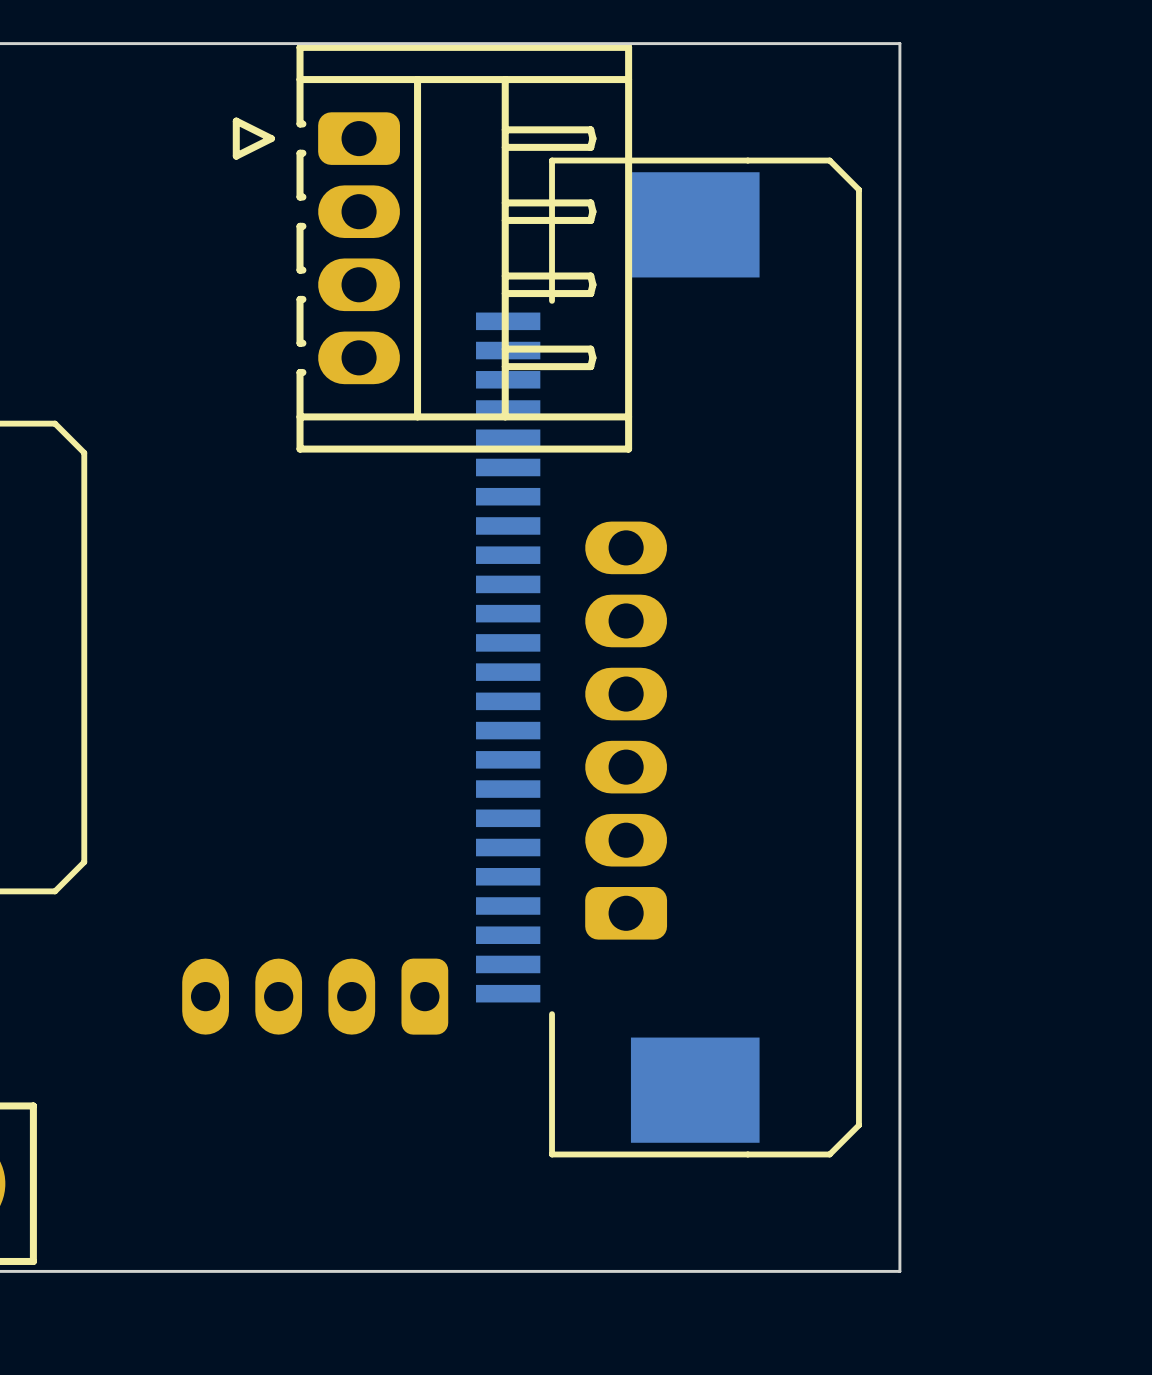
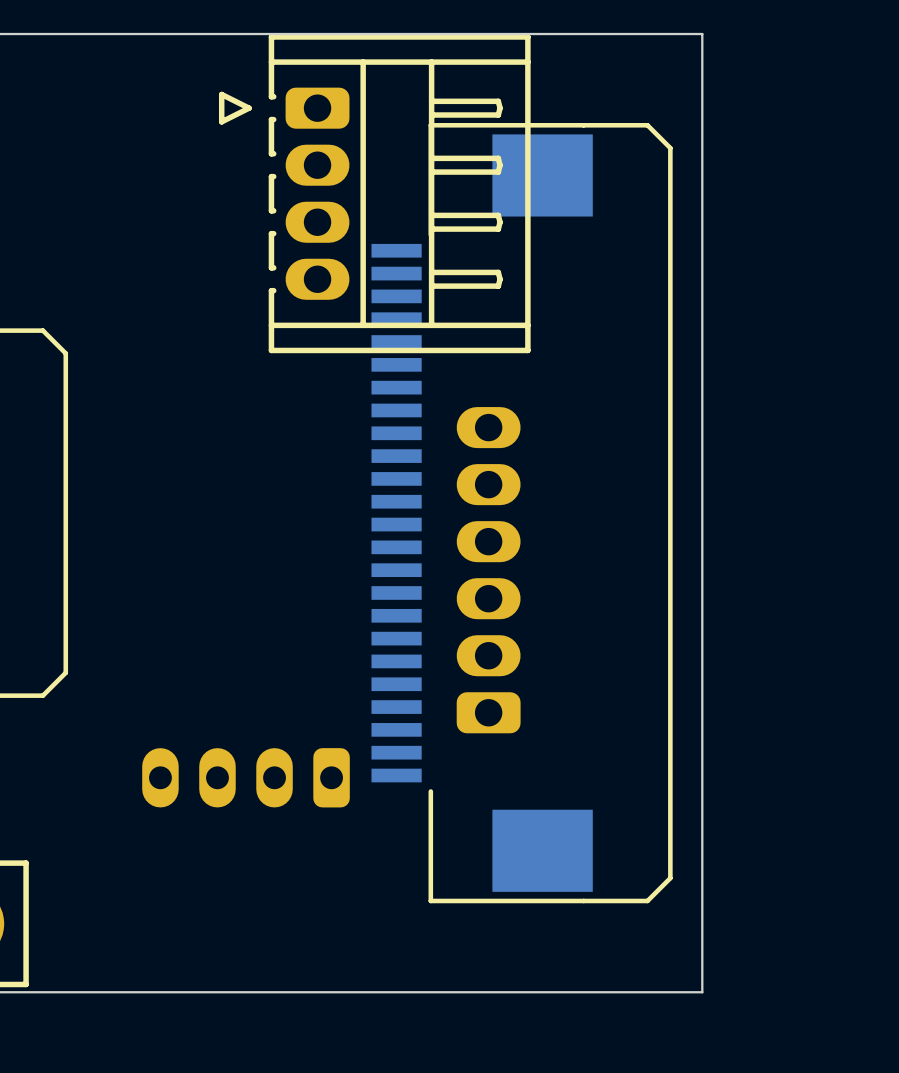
part position: (432, 248) -> (374, 193)

